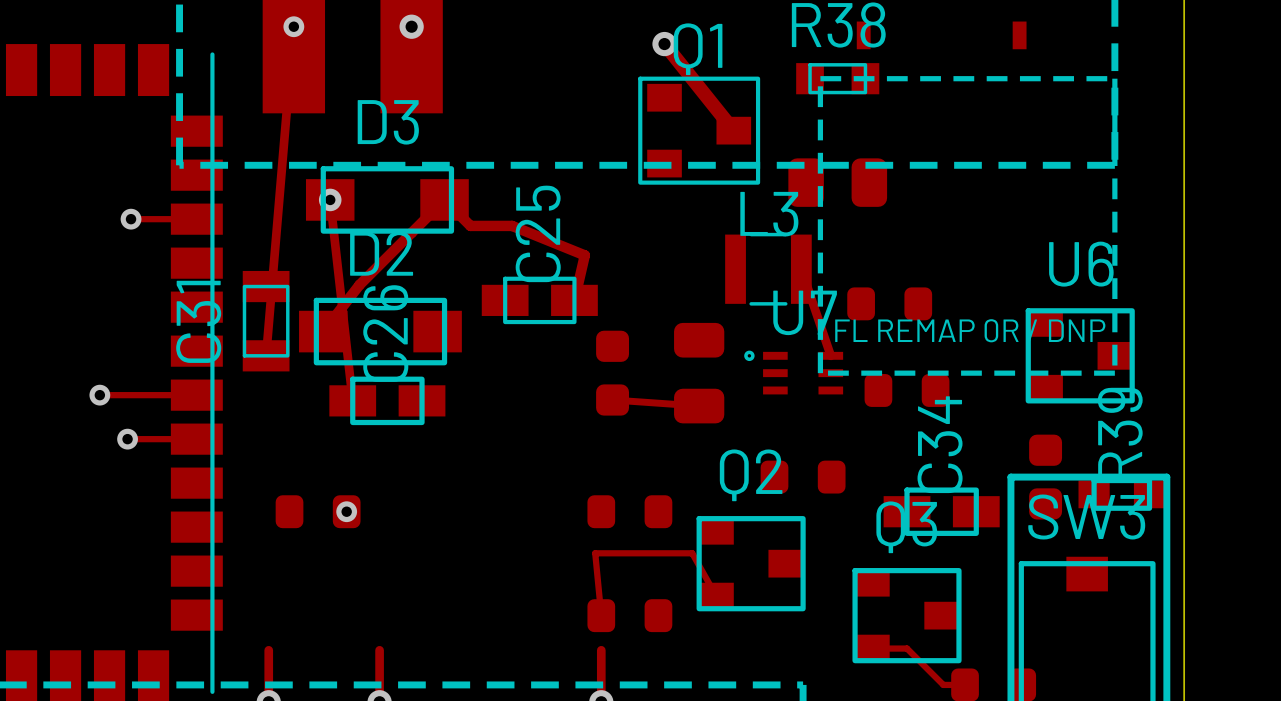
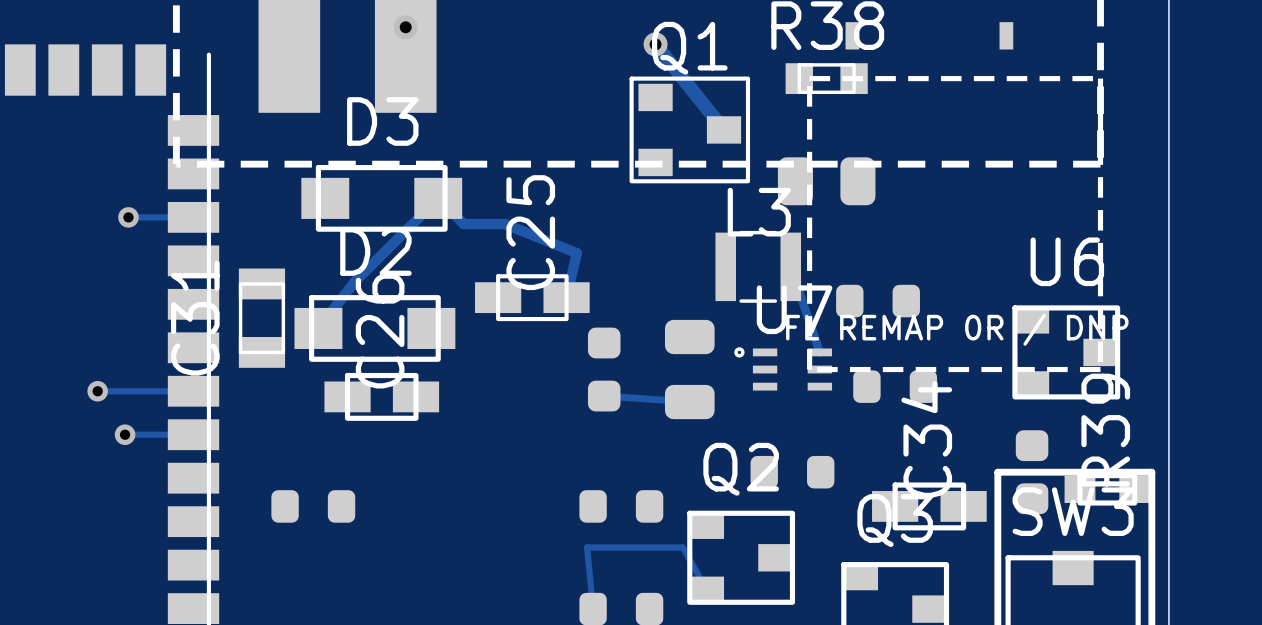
track: (293, 26) (266, 355) -> none
via: (293, 26) -> none
track: (330, 199) (352, 400) -> none
via: (330, 199) -> none
via: (346, 511) -> none

